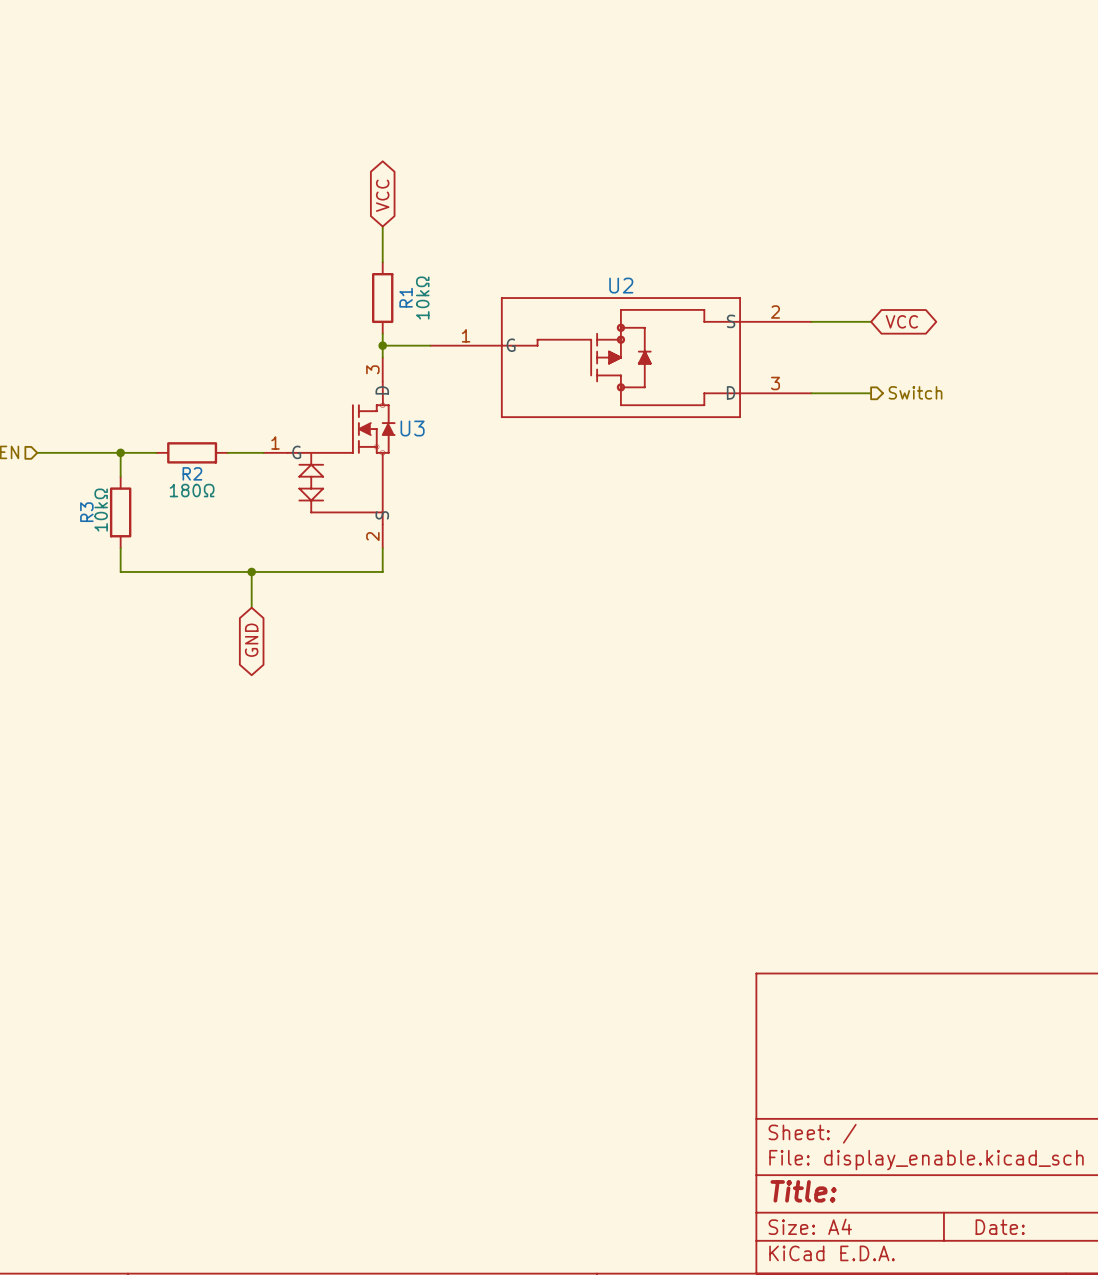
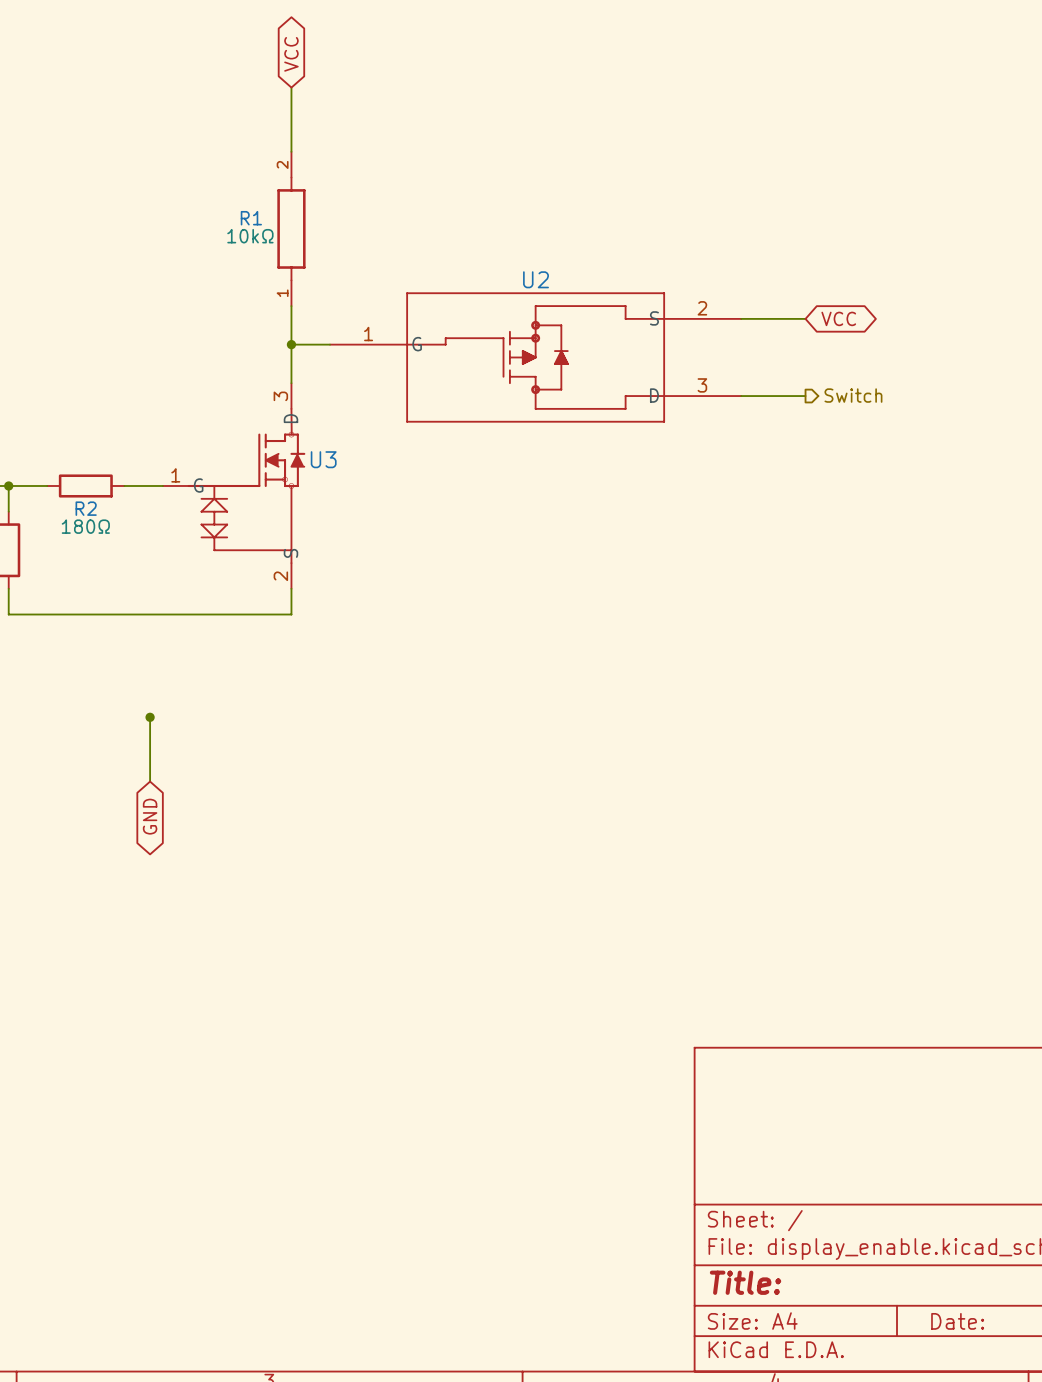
wire: none -> (291, 87) (291, 151)
global label position: VCC (382, 195) -> VCC (291, 54)
wire: (382, 226) (382, 262) -> none
R1 symbol: [371, 262, 394, 334] -> [277, 151, 306, 307]
wire: none -> (291, 306) (291, 357)
R1 name position: R1 (406, 297) -> R1 (251, 218)
R1 value position: 10kΩ (422, 298) -> 10kΩ (250, 236)
wire: none -> (291, 344) (330, 344)
wire: (811, 321) (871, 321) -> (741, 318) (805, 318)
global label position: VCC (901, 321) -> VCC (838, 318)
wire: (382, 345) (430, 345) -> none
junction position: (382, 345) -> (291, 344)
U2 position: (620, 357) -> (535, 357)
hierarchical label position: Switch (915, 392) -> Switch (853, 395)
wire: (811, 393) (871, 393) -> (741, 396) (805, 396)
wire: (251, 571) (251, 607) -> none
junction: (251, 571) -> none
global label position: GND (251, 640) -> GND (150, 816)
wire: none -> (150, 717) (150, 781)
junction: none -> (150, 717)

